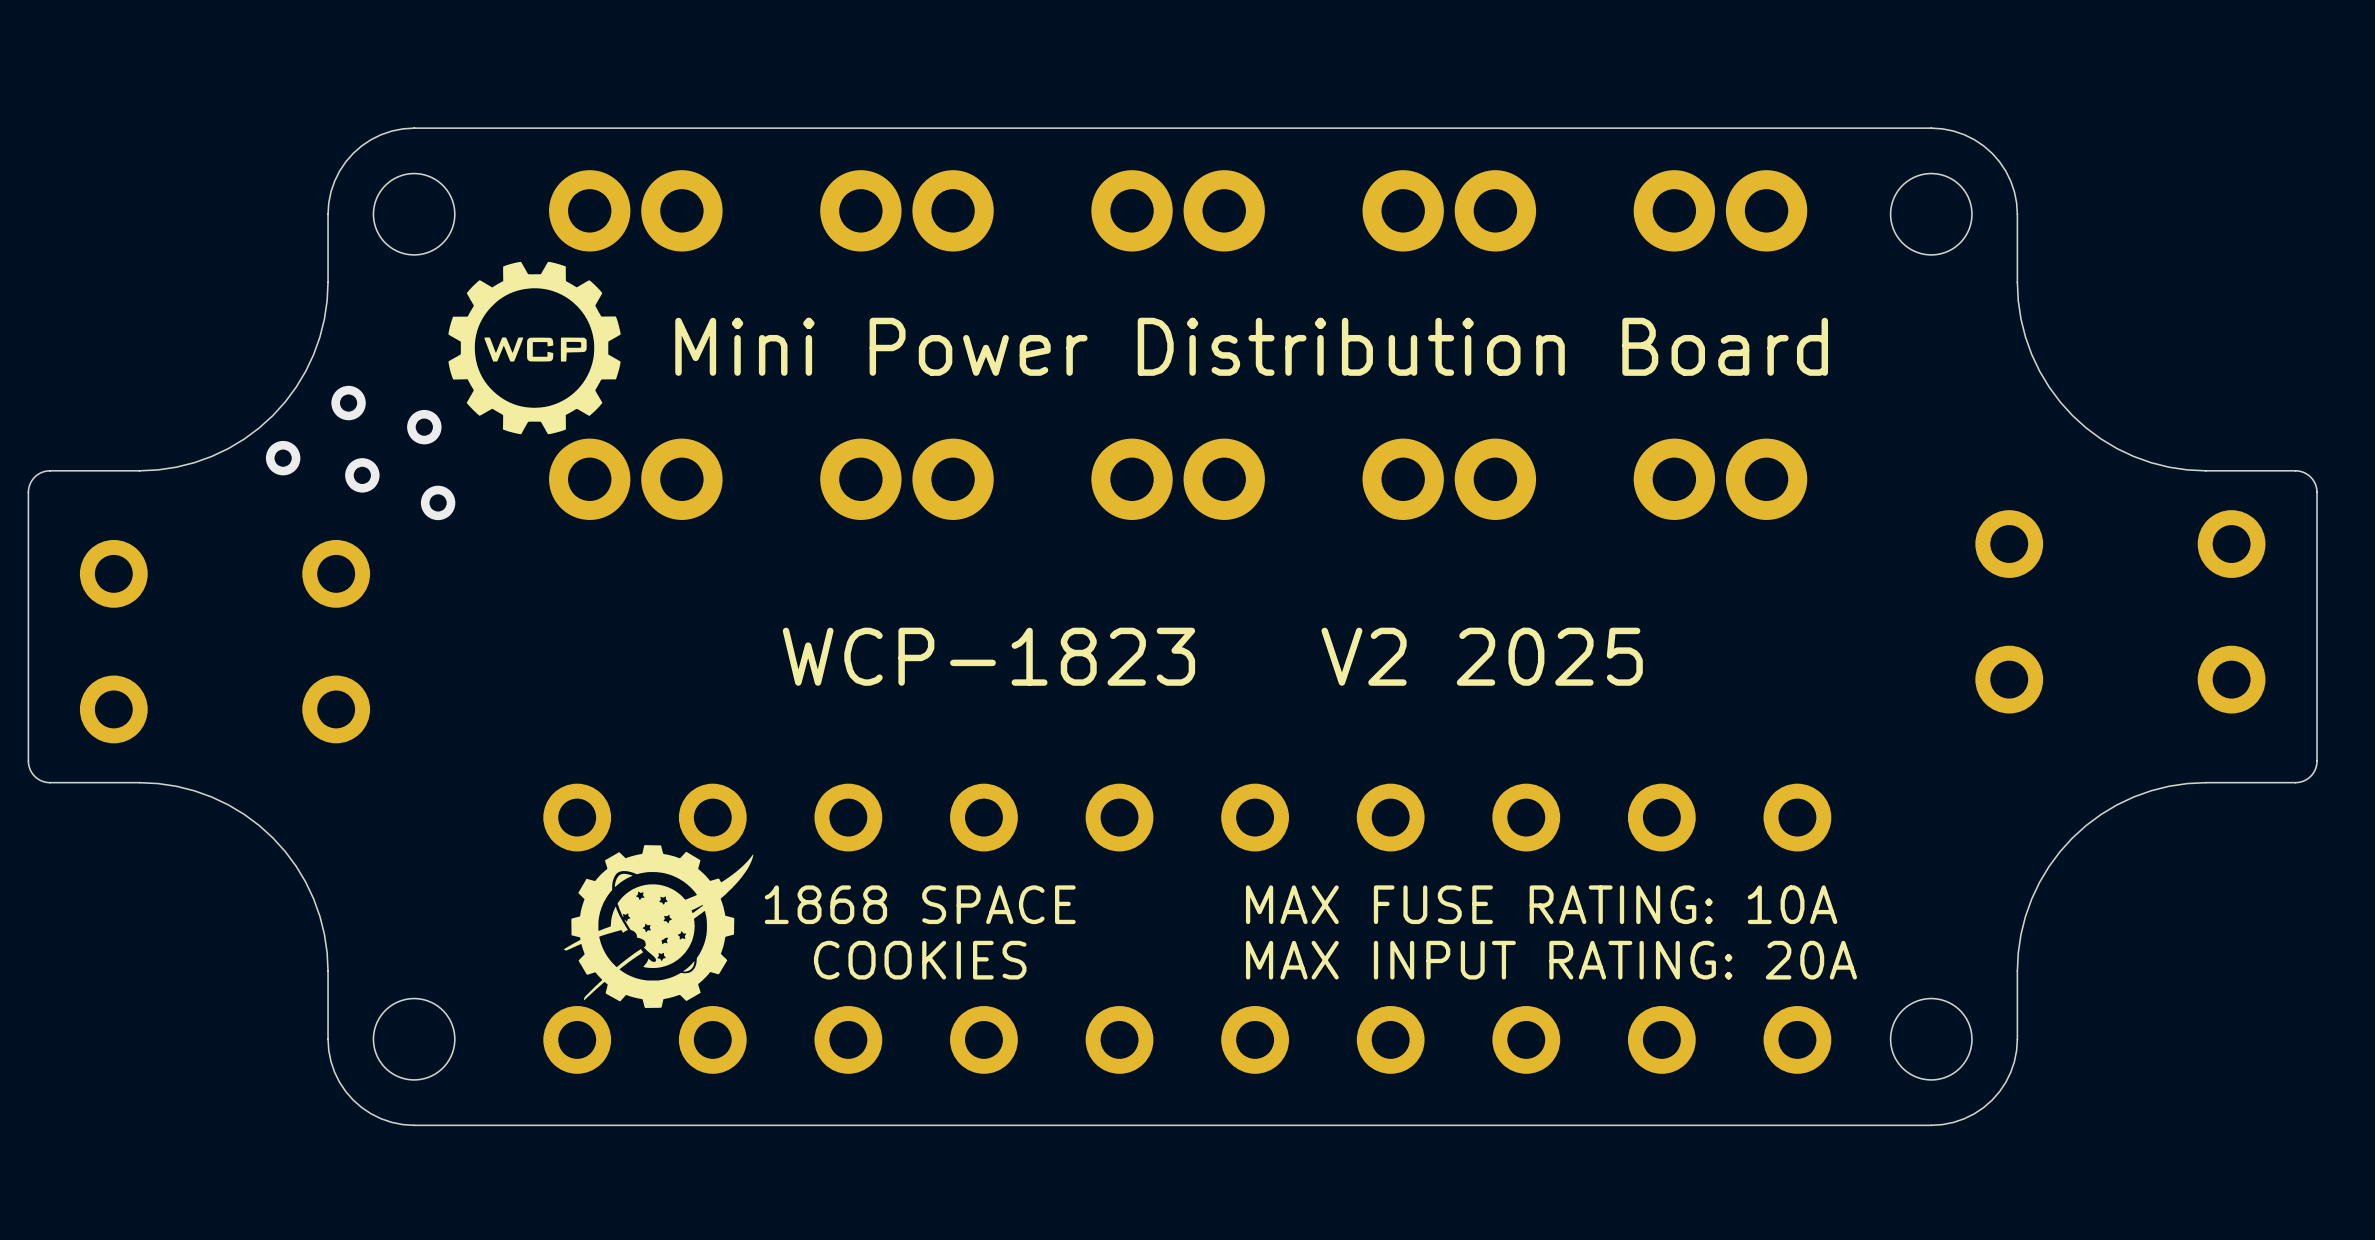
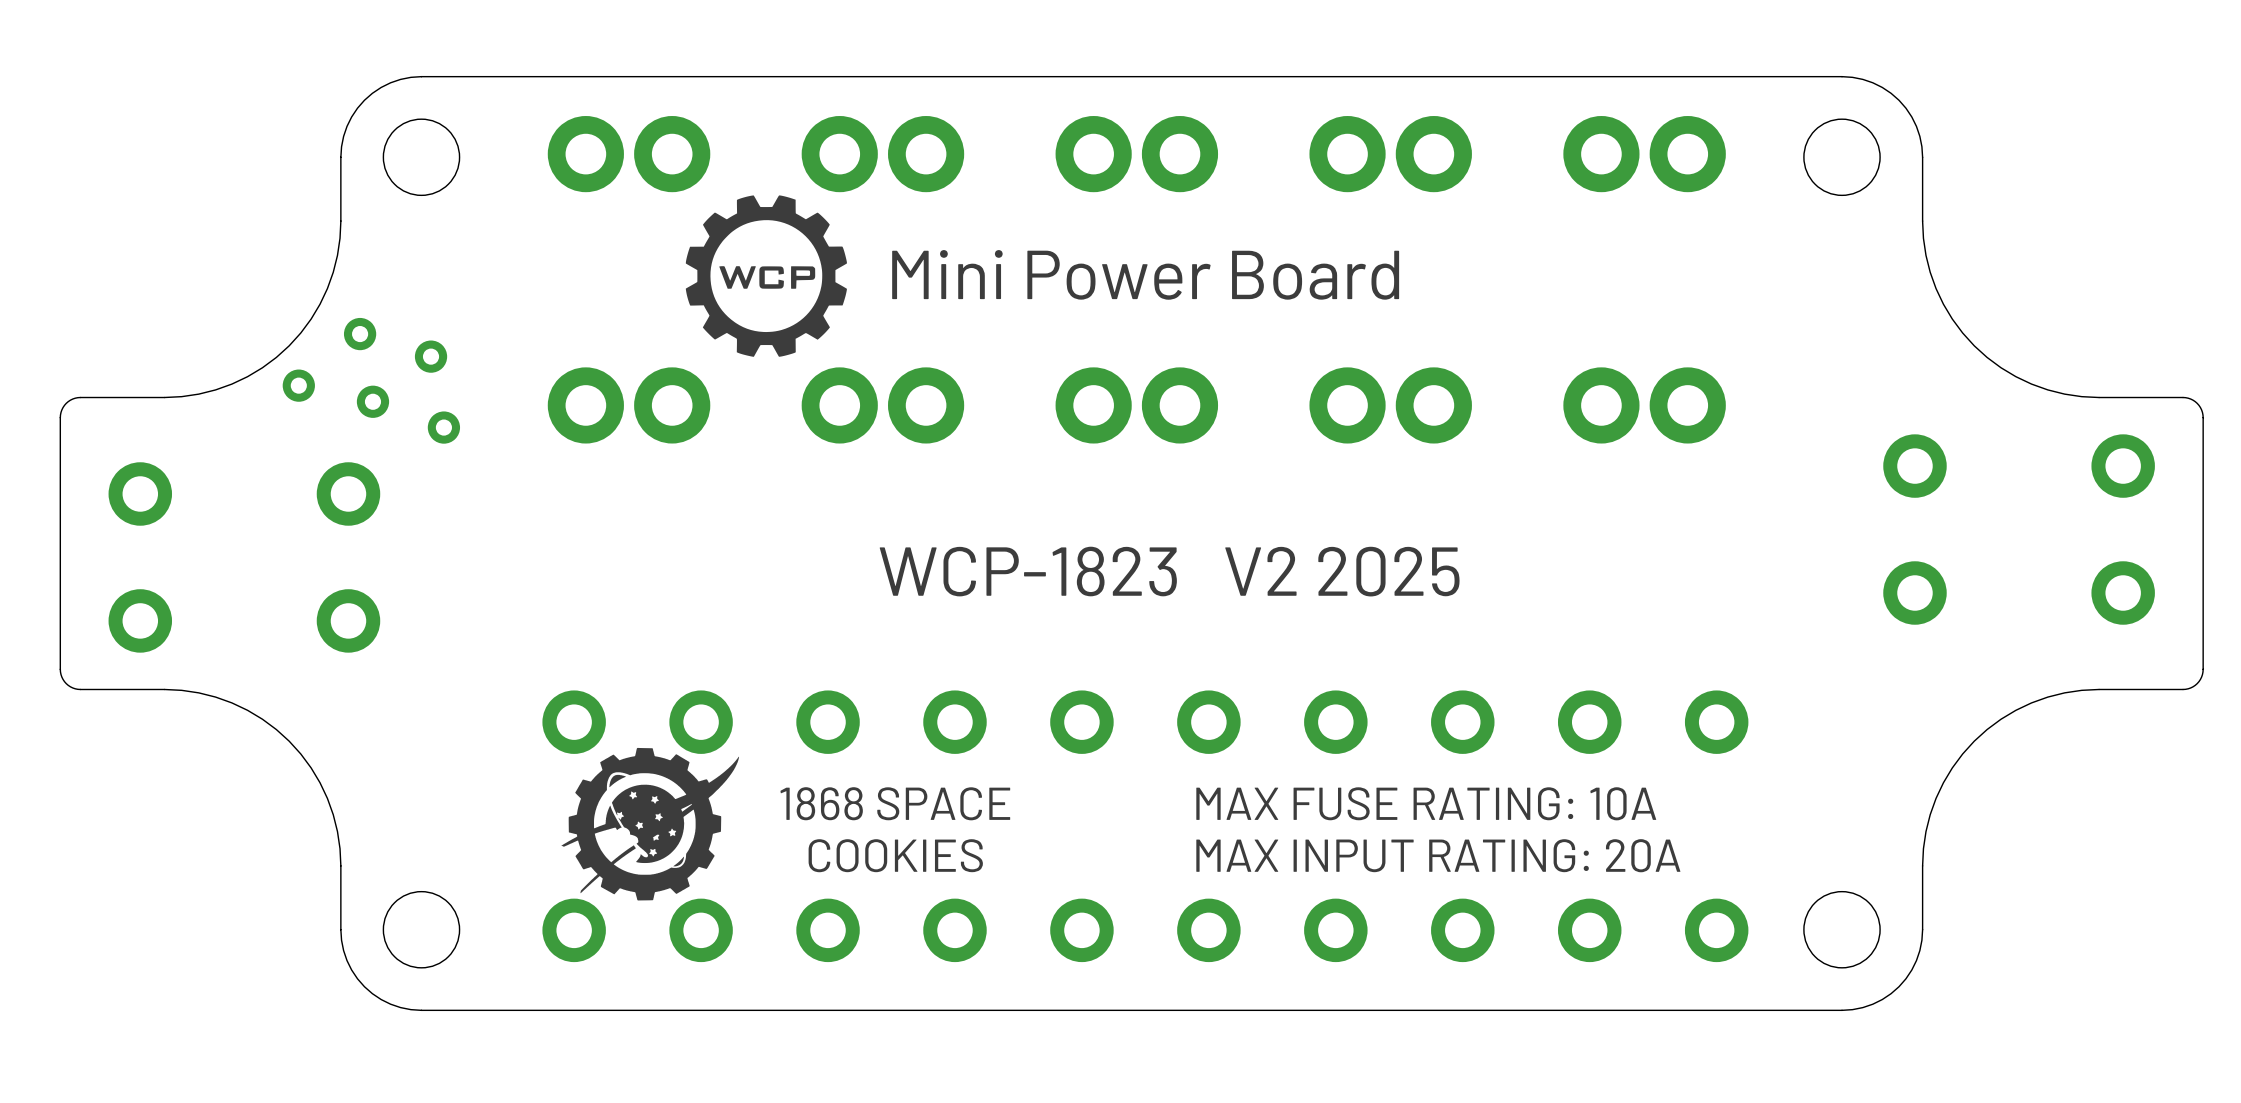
text: Mini Power Distribution Board (1251, 346) -> Mini Power Board (1145, 274)
drawing position: (534, 348) -> (766, 276)

